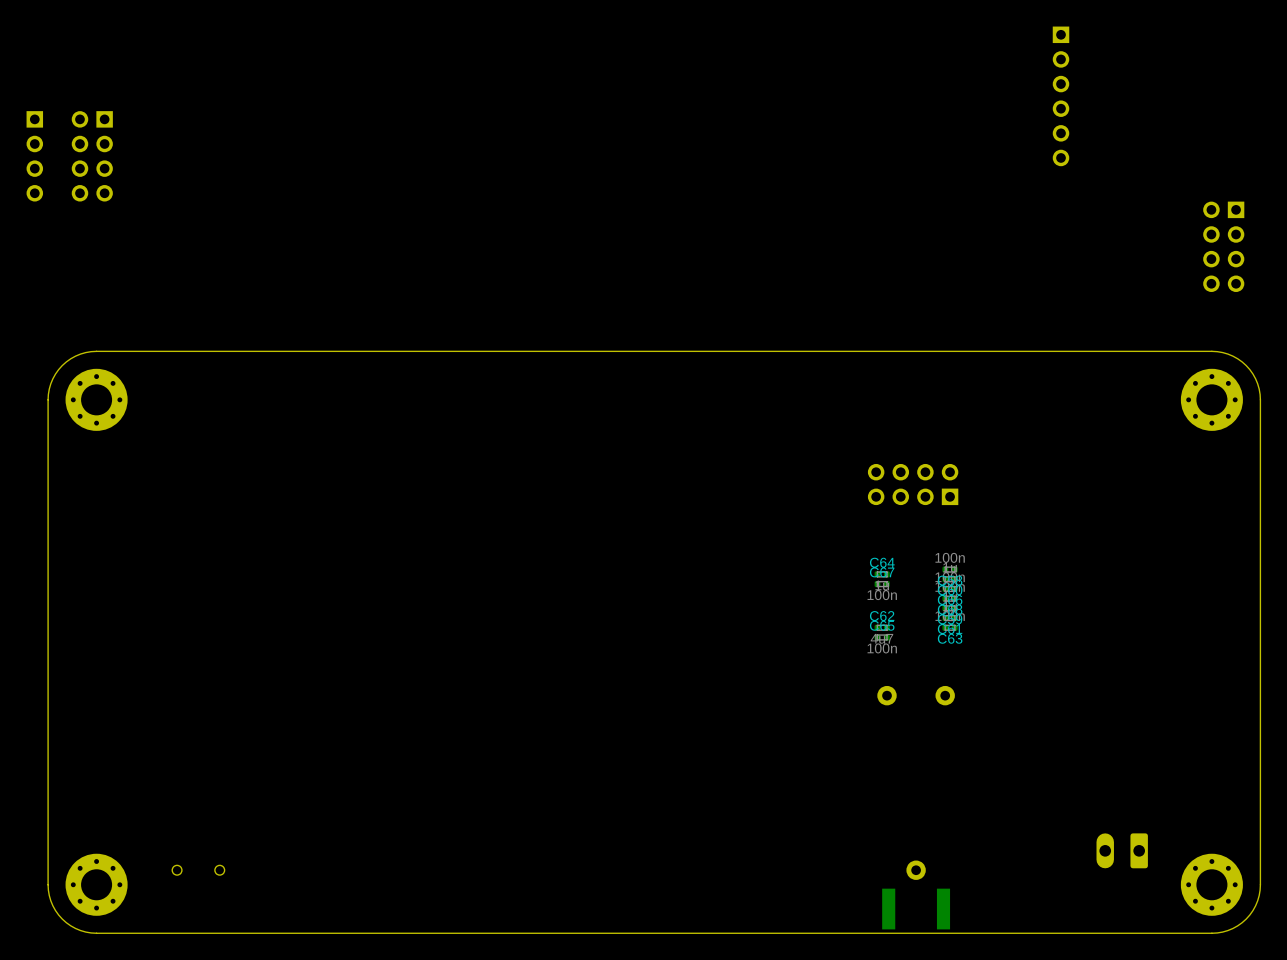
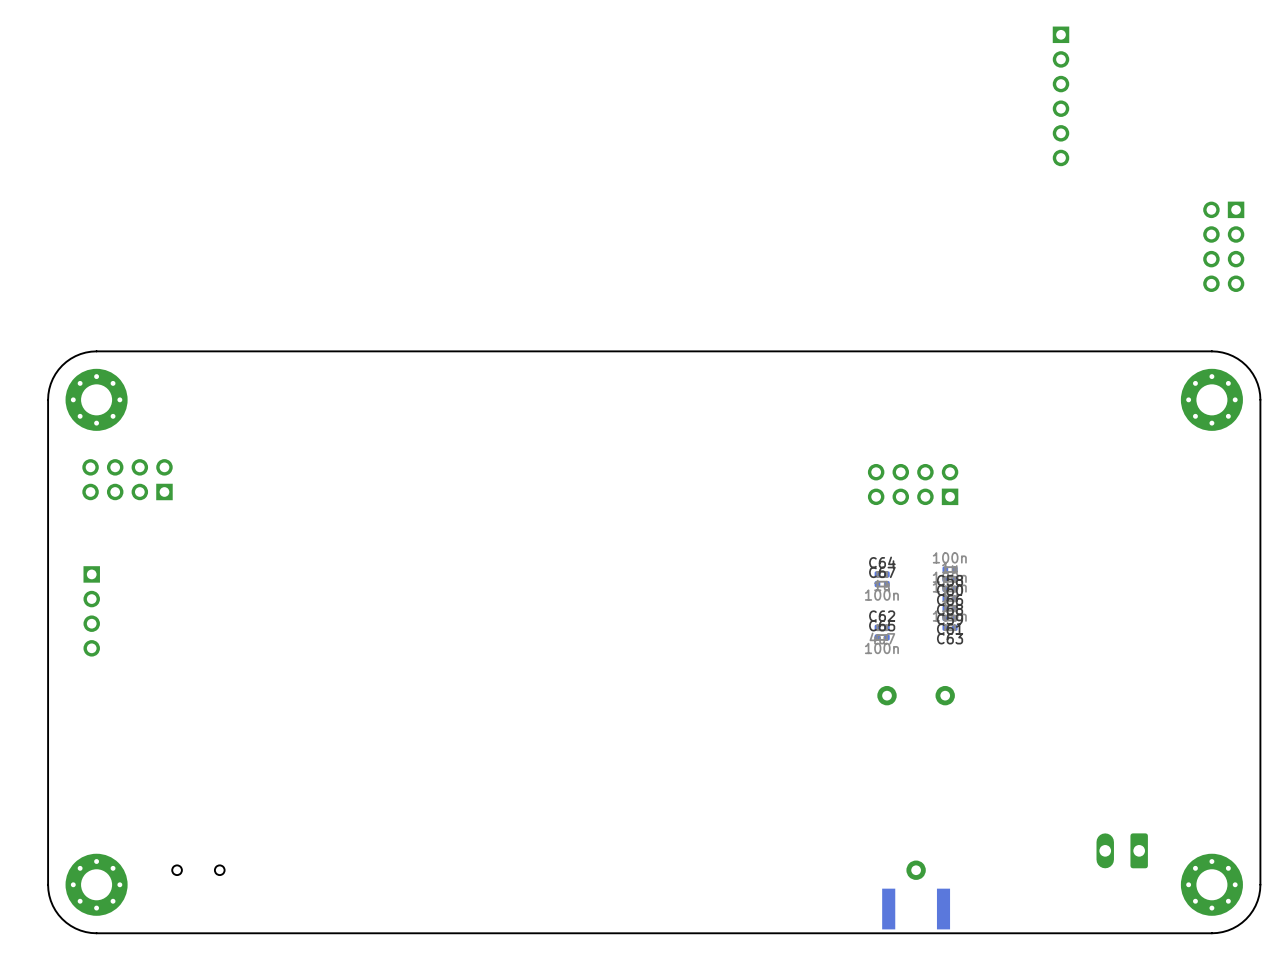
part: (34, 156) -> none
part: (92, 156) -> none
part: none -> (127, 479)
part: none -> (91, 611)

